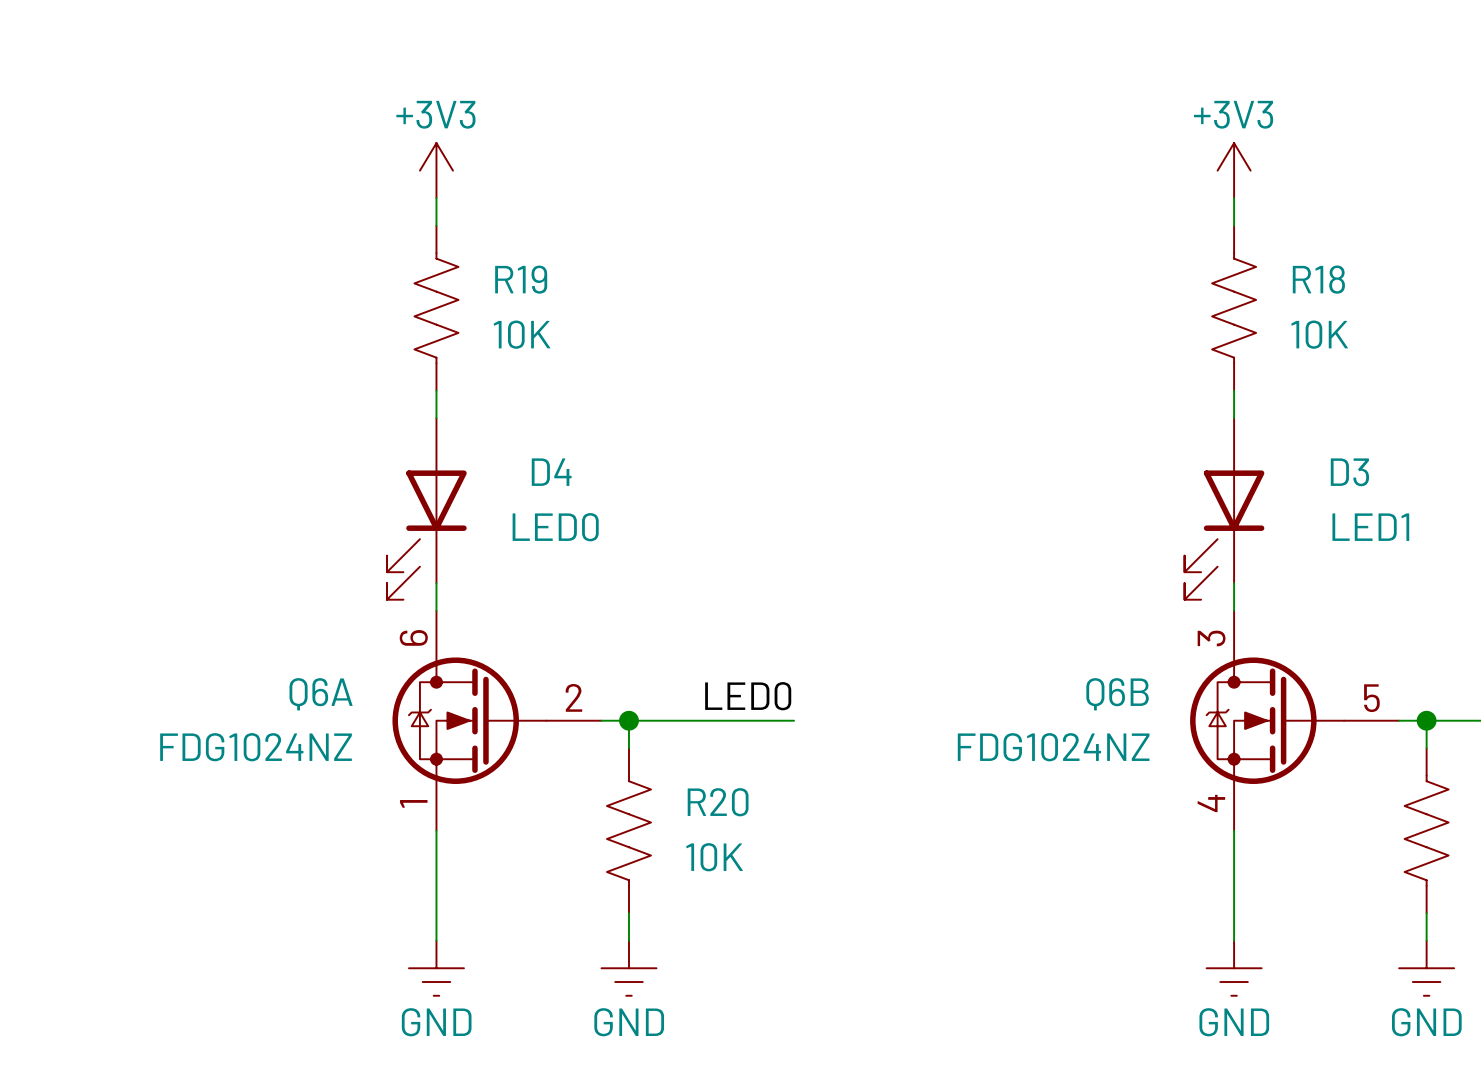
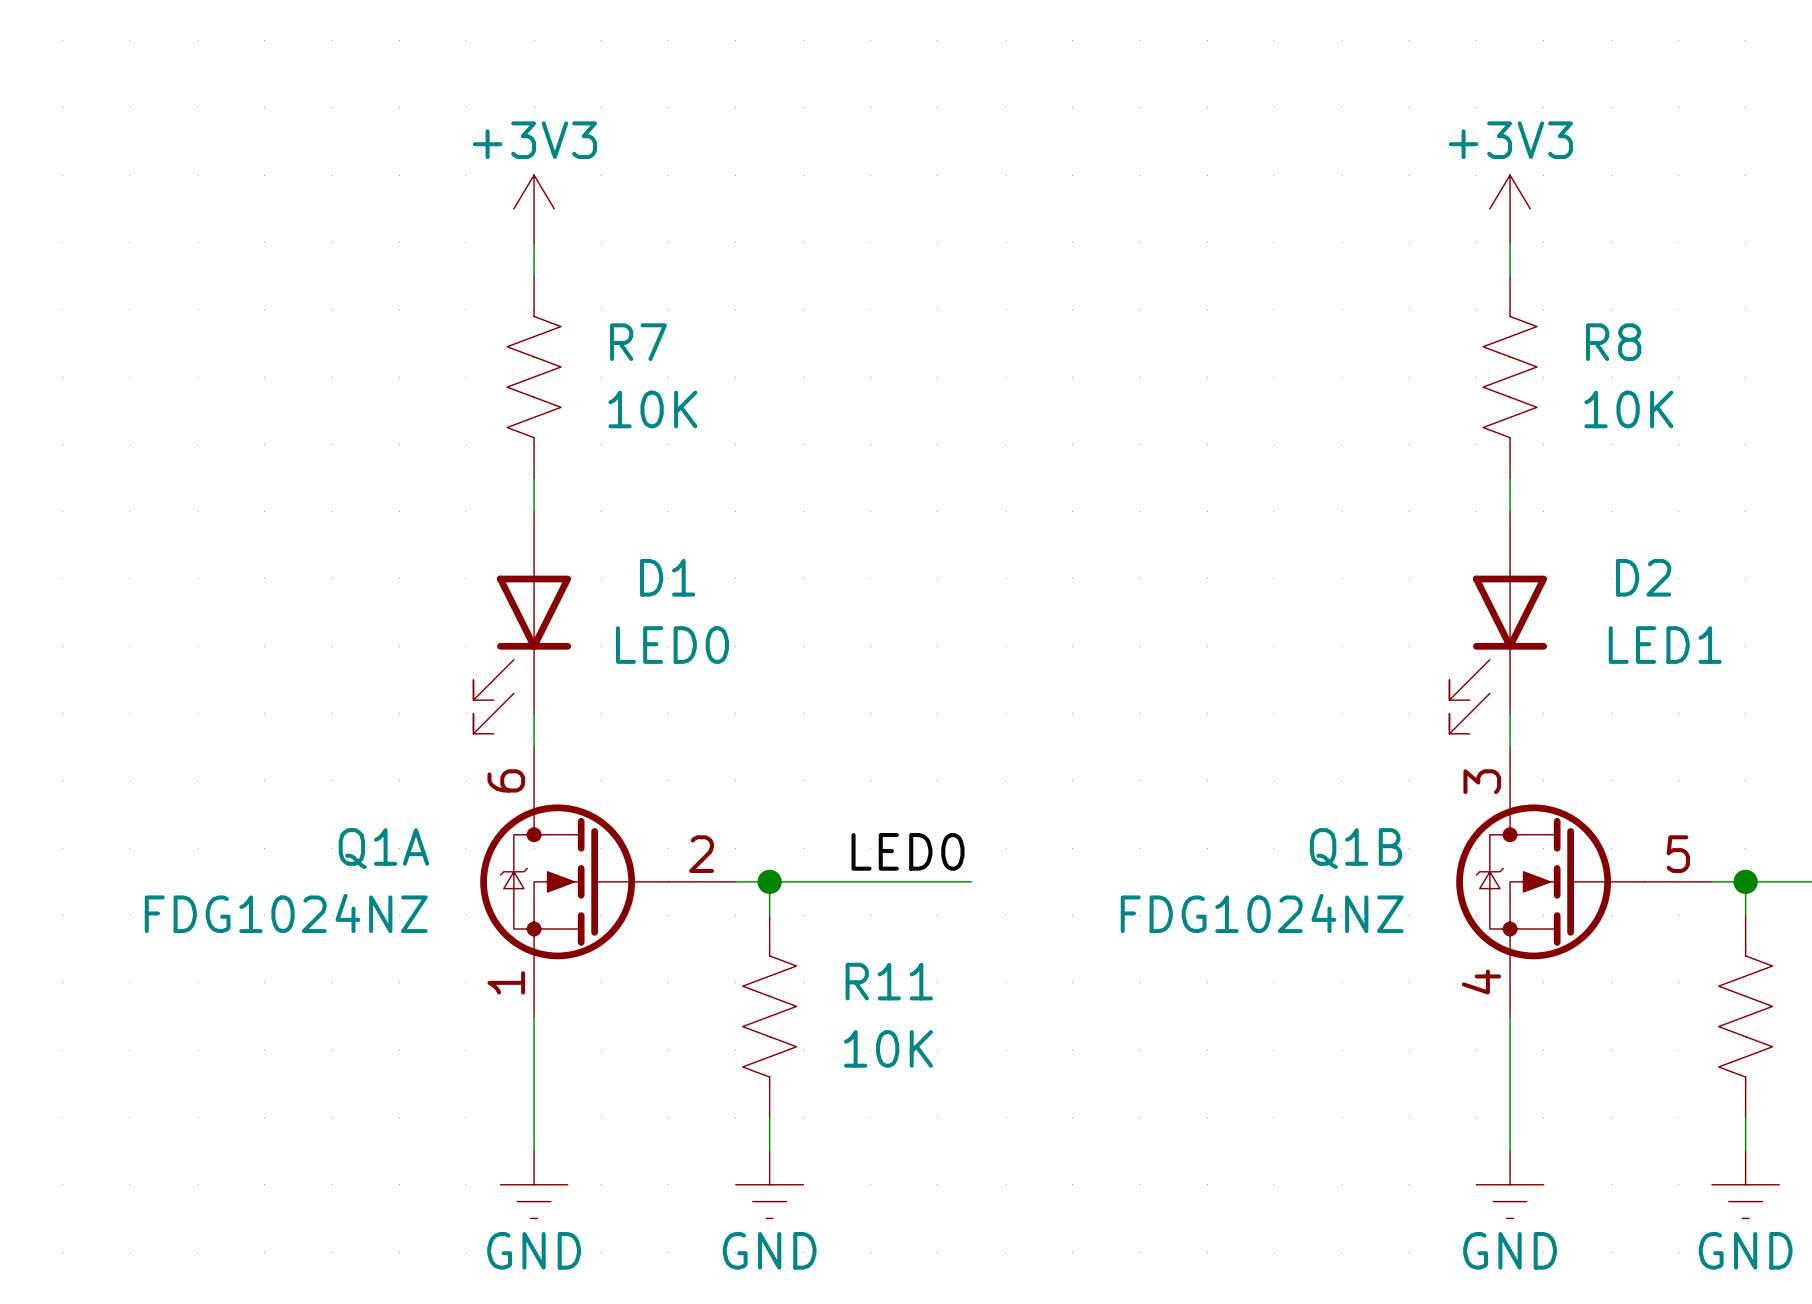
R19 name: R19 (521, 279) -> R7 (638, 342)
R18 name: R18 (1318, 279) -> R8 (1613, 342)
D4 name: D4 (551, 472) -> D1 (667, 577)
D3 name: D3 (1349, 472) -> D2 (1643, 577)
Q6A name: Q6A (321, 694) -> Q1A (383, 848)
Q6B name: Q6B (1117, 694) -> Q1B (1355, 848)
R20 name: R20 (718, 802) -> R11 (889, 981)

